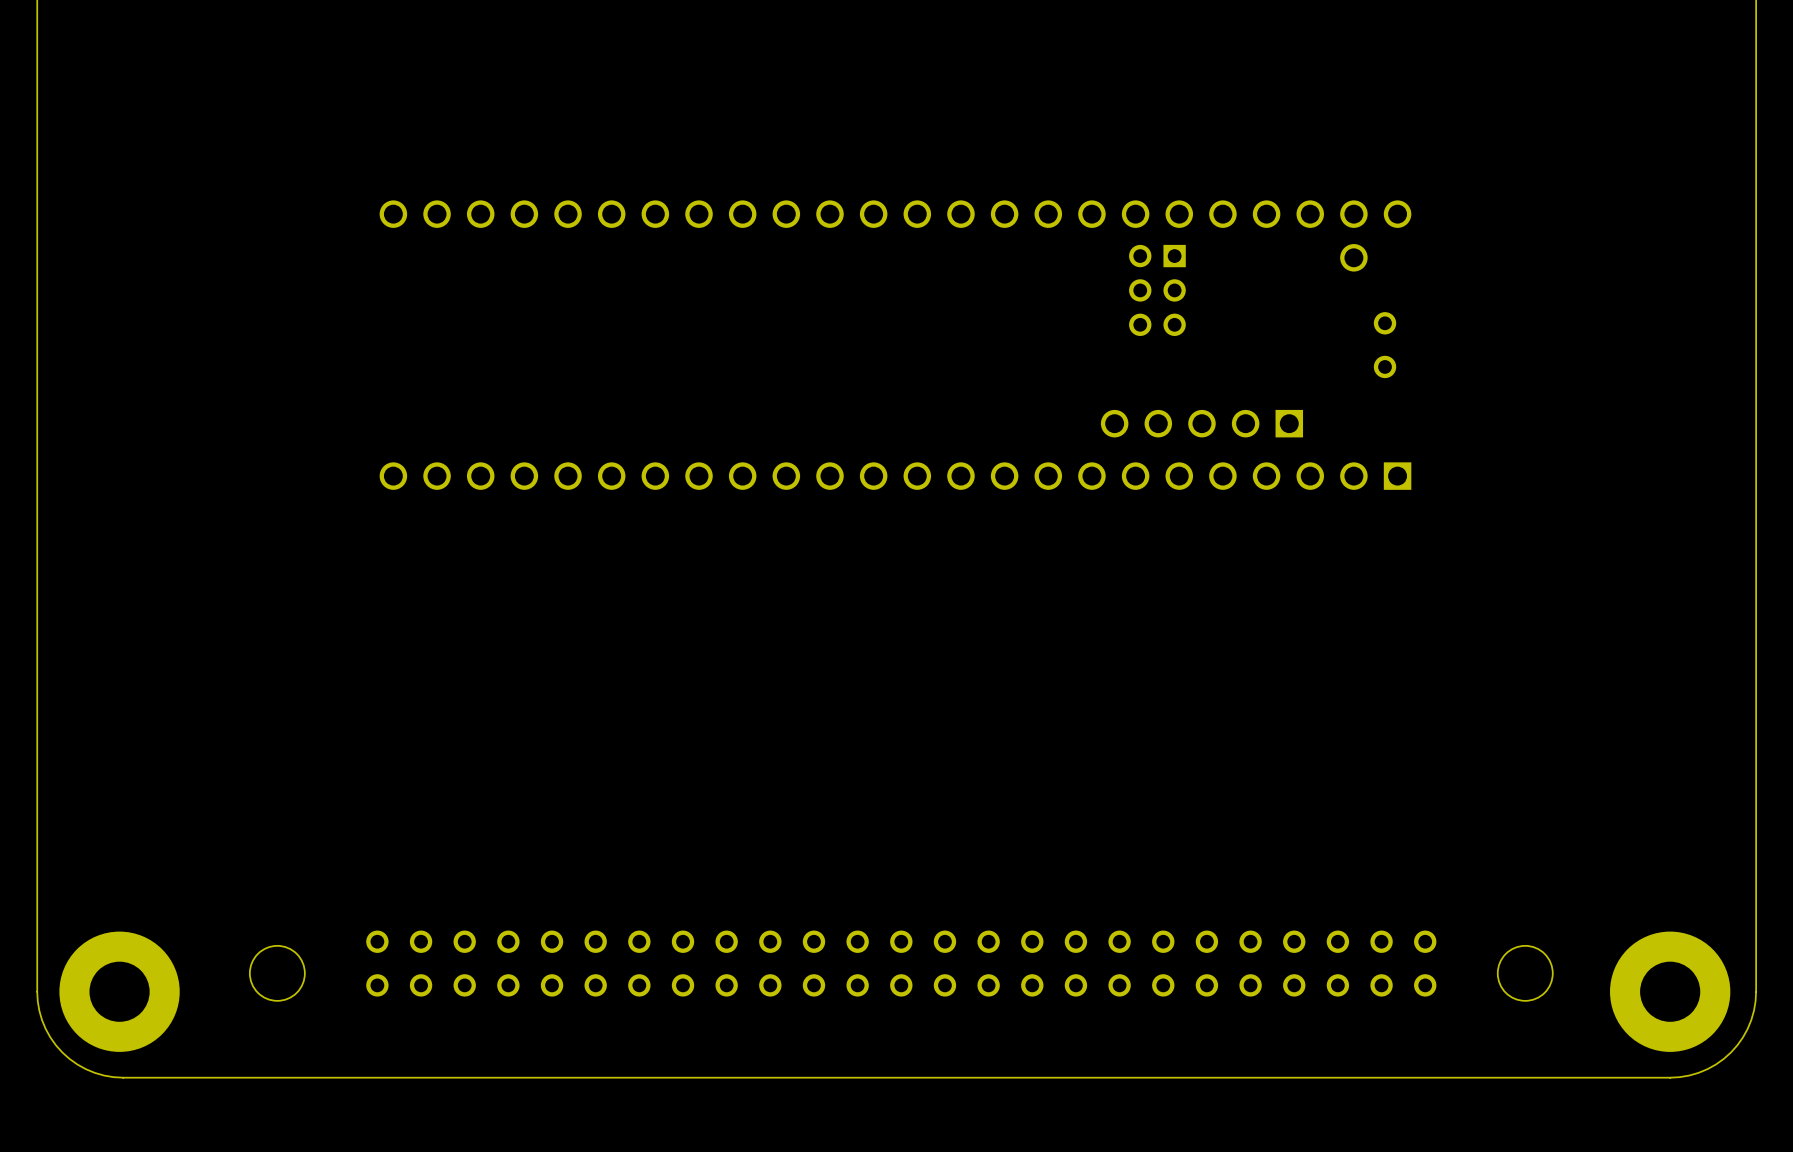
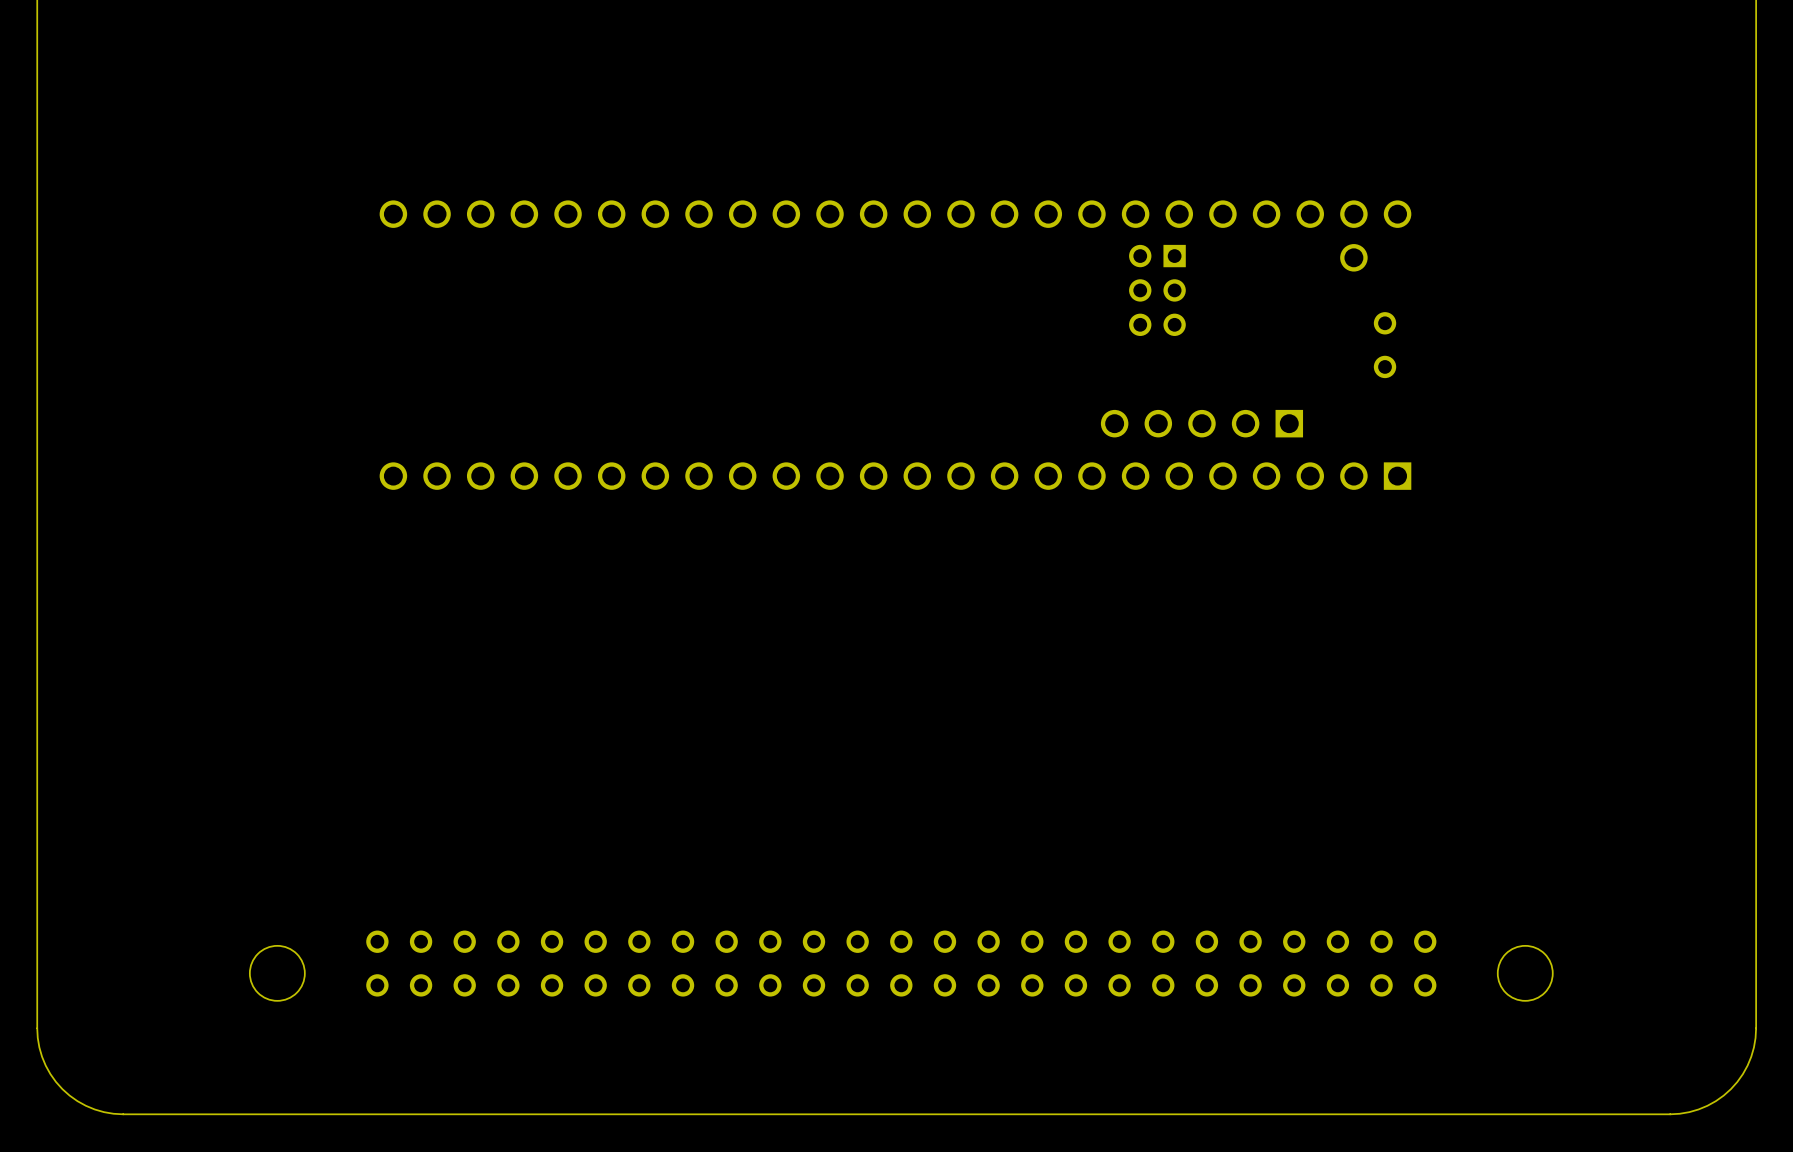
part: (119, 991) -> none
part: (1670, 991) -> none
board edge: (1756, 991) (1751, 1020) (1742, 1037) (1730, 1052) (1707, 1069) (1689, 1075) (1670, 1077) (123, 1077) (94, 1072) (77, 1064) (62, 1052) (45, 1029) (39, 1010) (37, 991) -> (1756, 991) (1755, 1037) (1751, 1056) (1742, 1074) (1730, 1089) (1715, 1101) (1689, 1112) (1670, 1114) (113, 1113) (94, 1109) (77, 1101) (62, 1089) (50, 1074) (42, 1056) (37, 1037) (37, 991)

